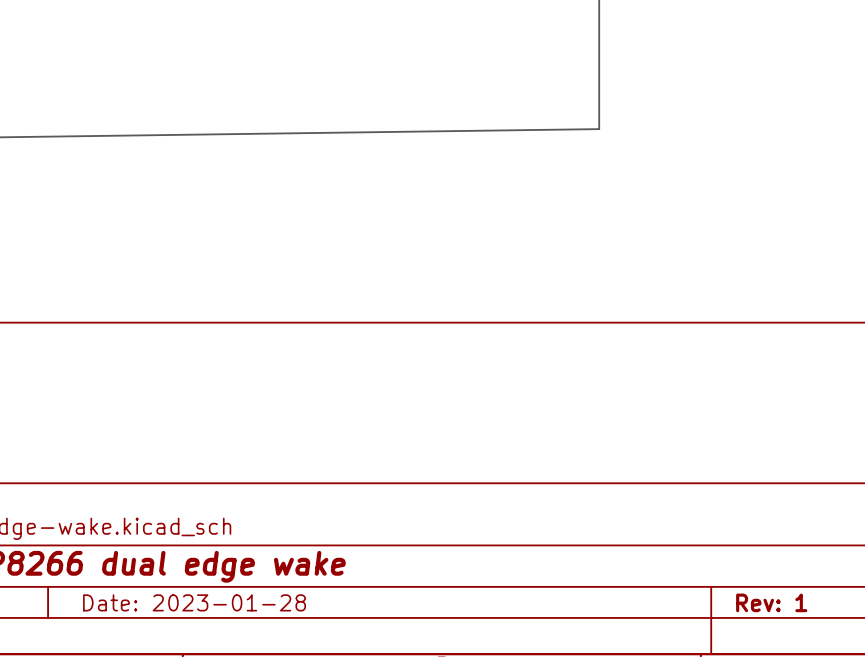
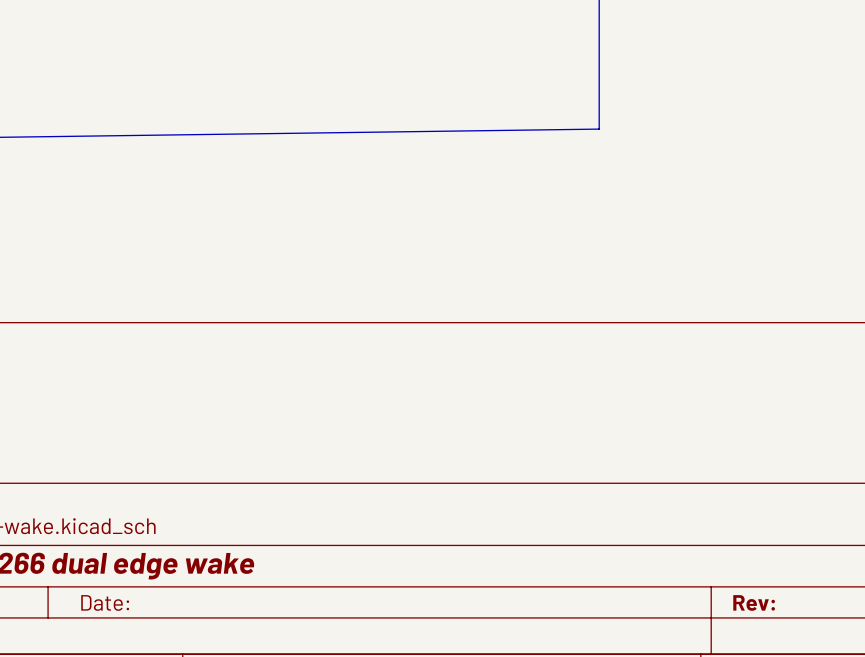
title block: Date: 2023-01-28 (194, 602) -> Date: (105, 602)
title block: Rev: 1 (771, 602) -> Rev: (754, 602)

